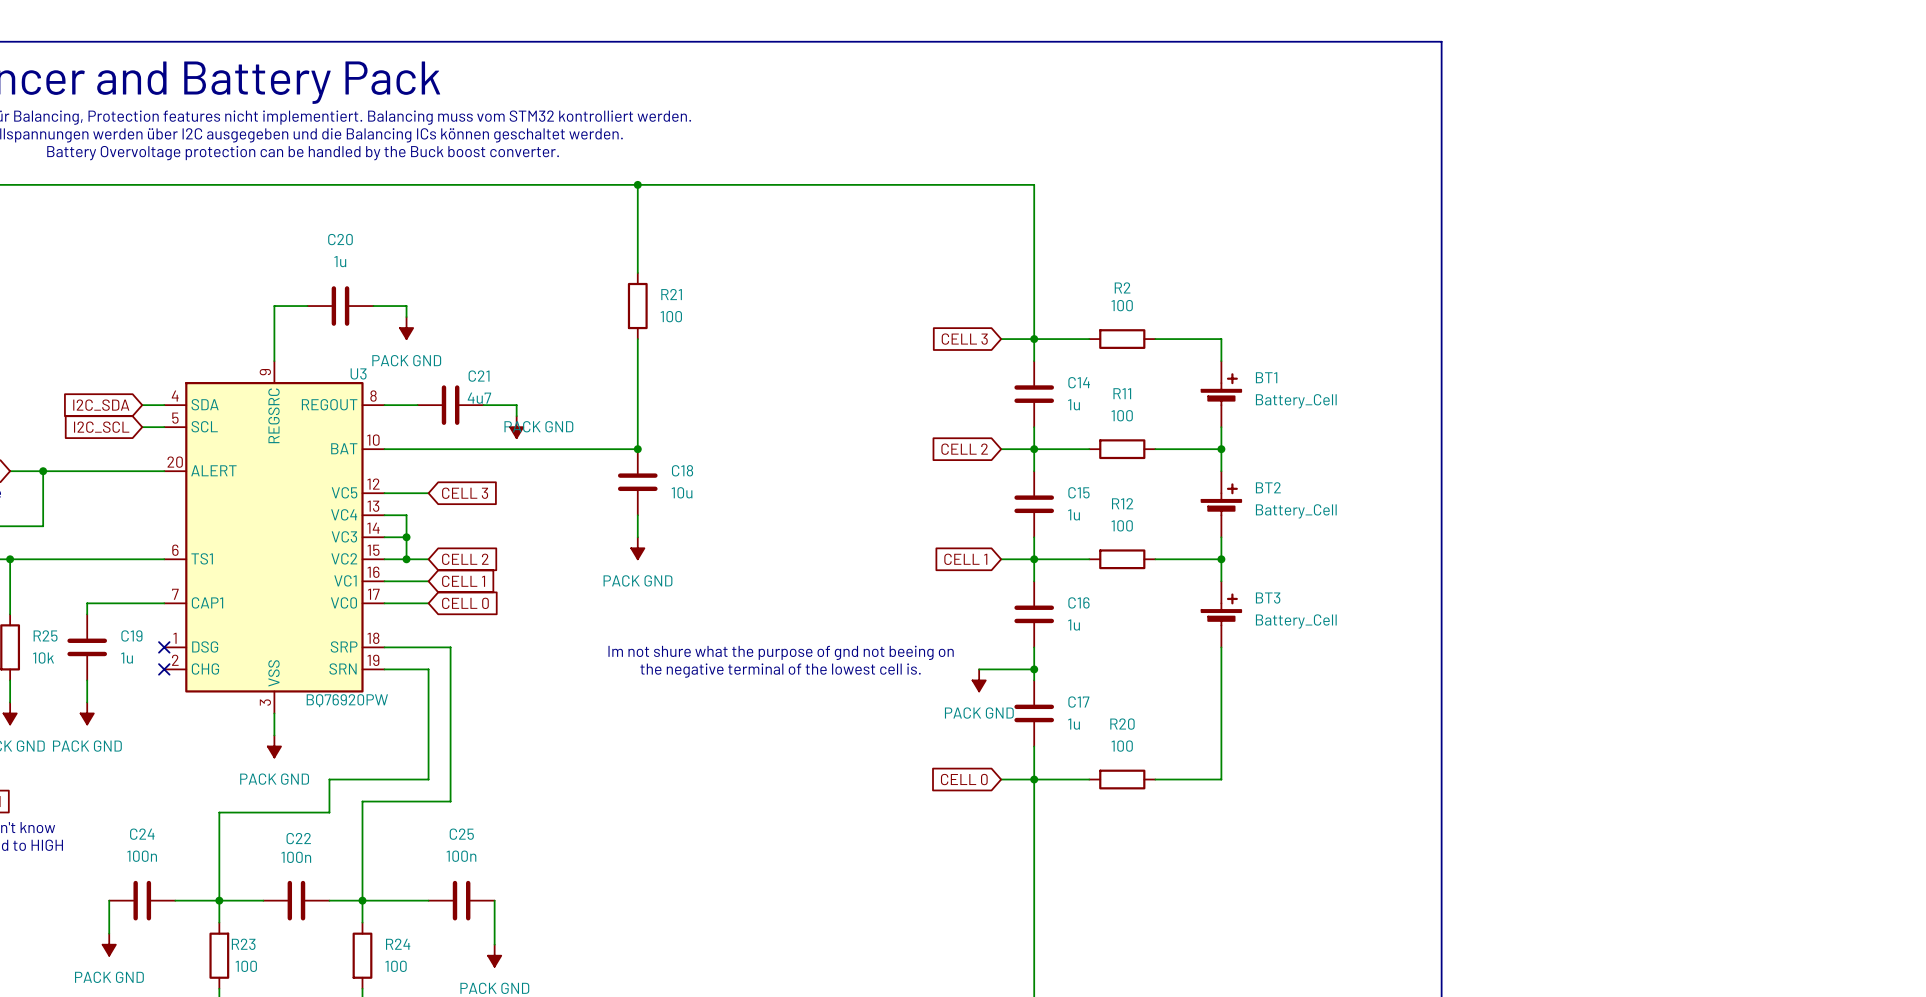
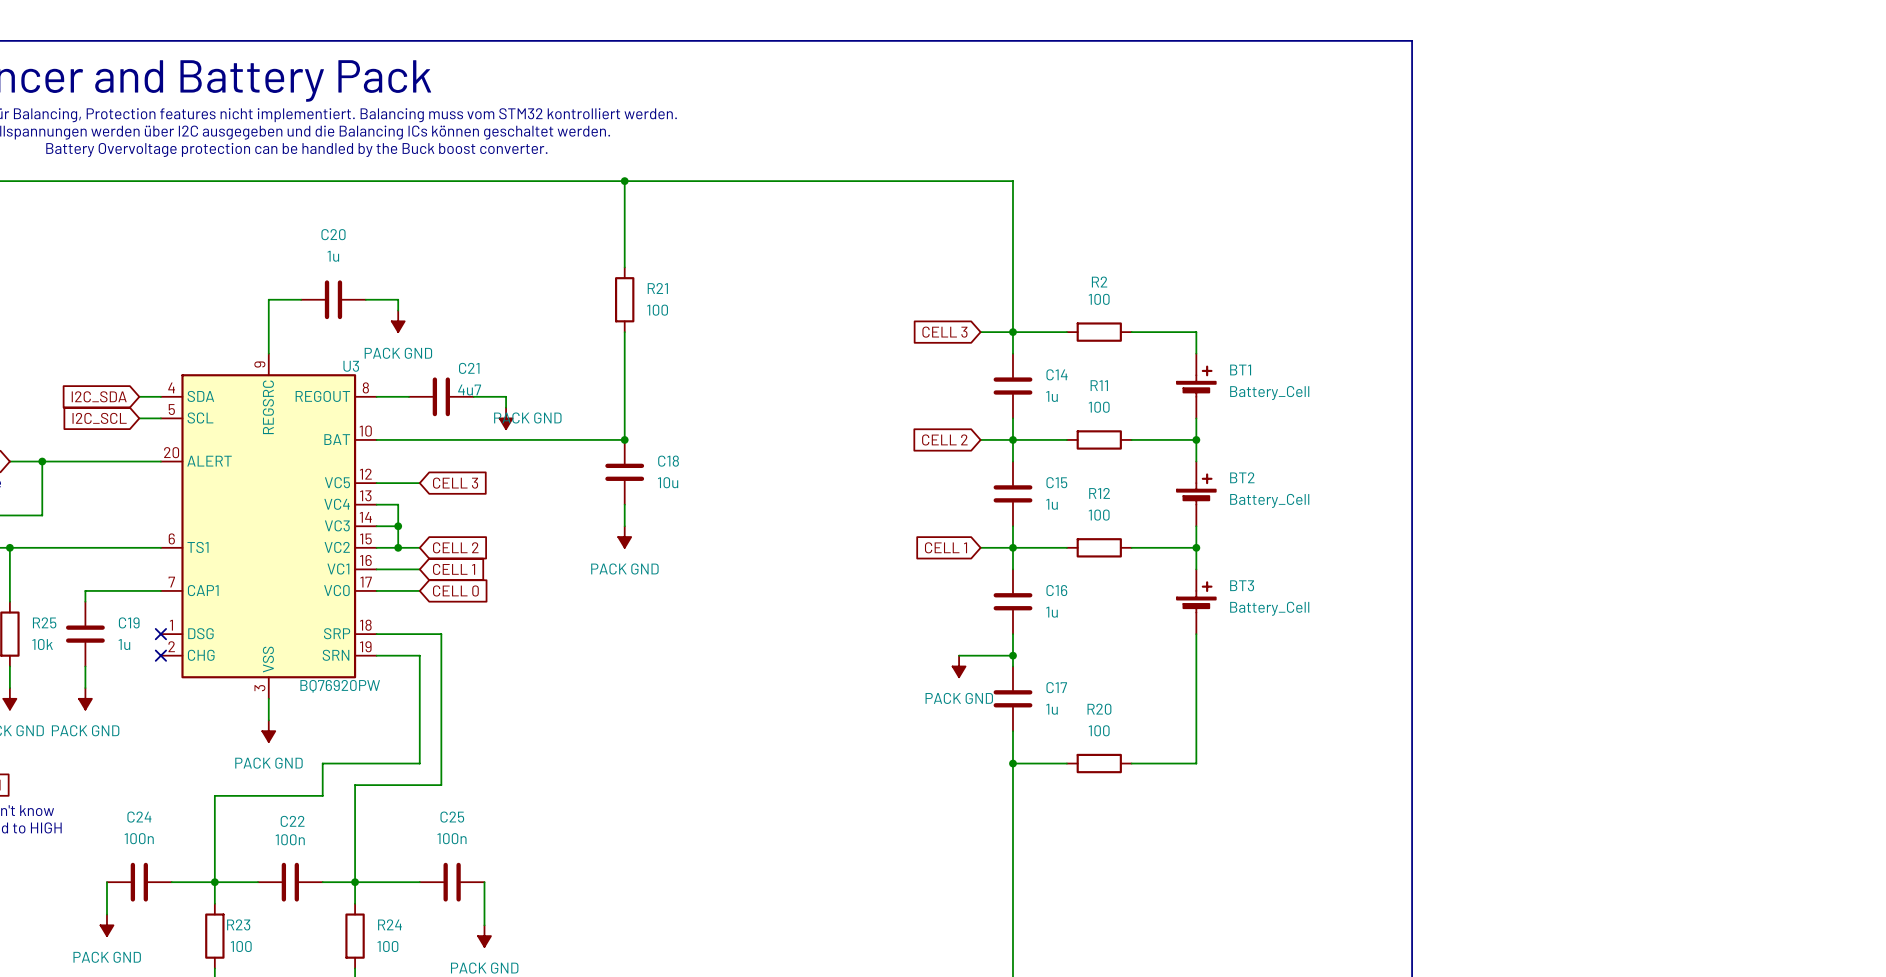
text: Im not shure what the purpose of gnd not beeing on (781, 652) -> none
text: the negative terminal of the lowest cell is. (780, 670) -> none
global label: CELL 0 (964, 779) -> none
wire: (1001, 779) (1034, 779) -> none

